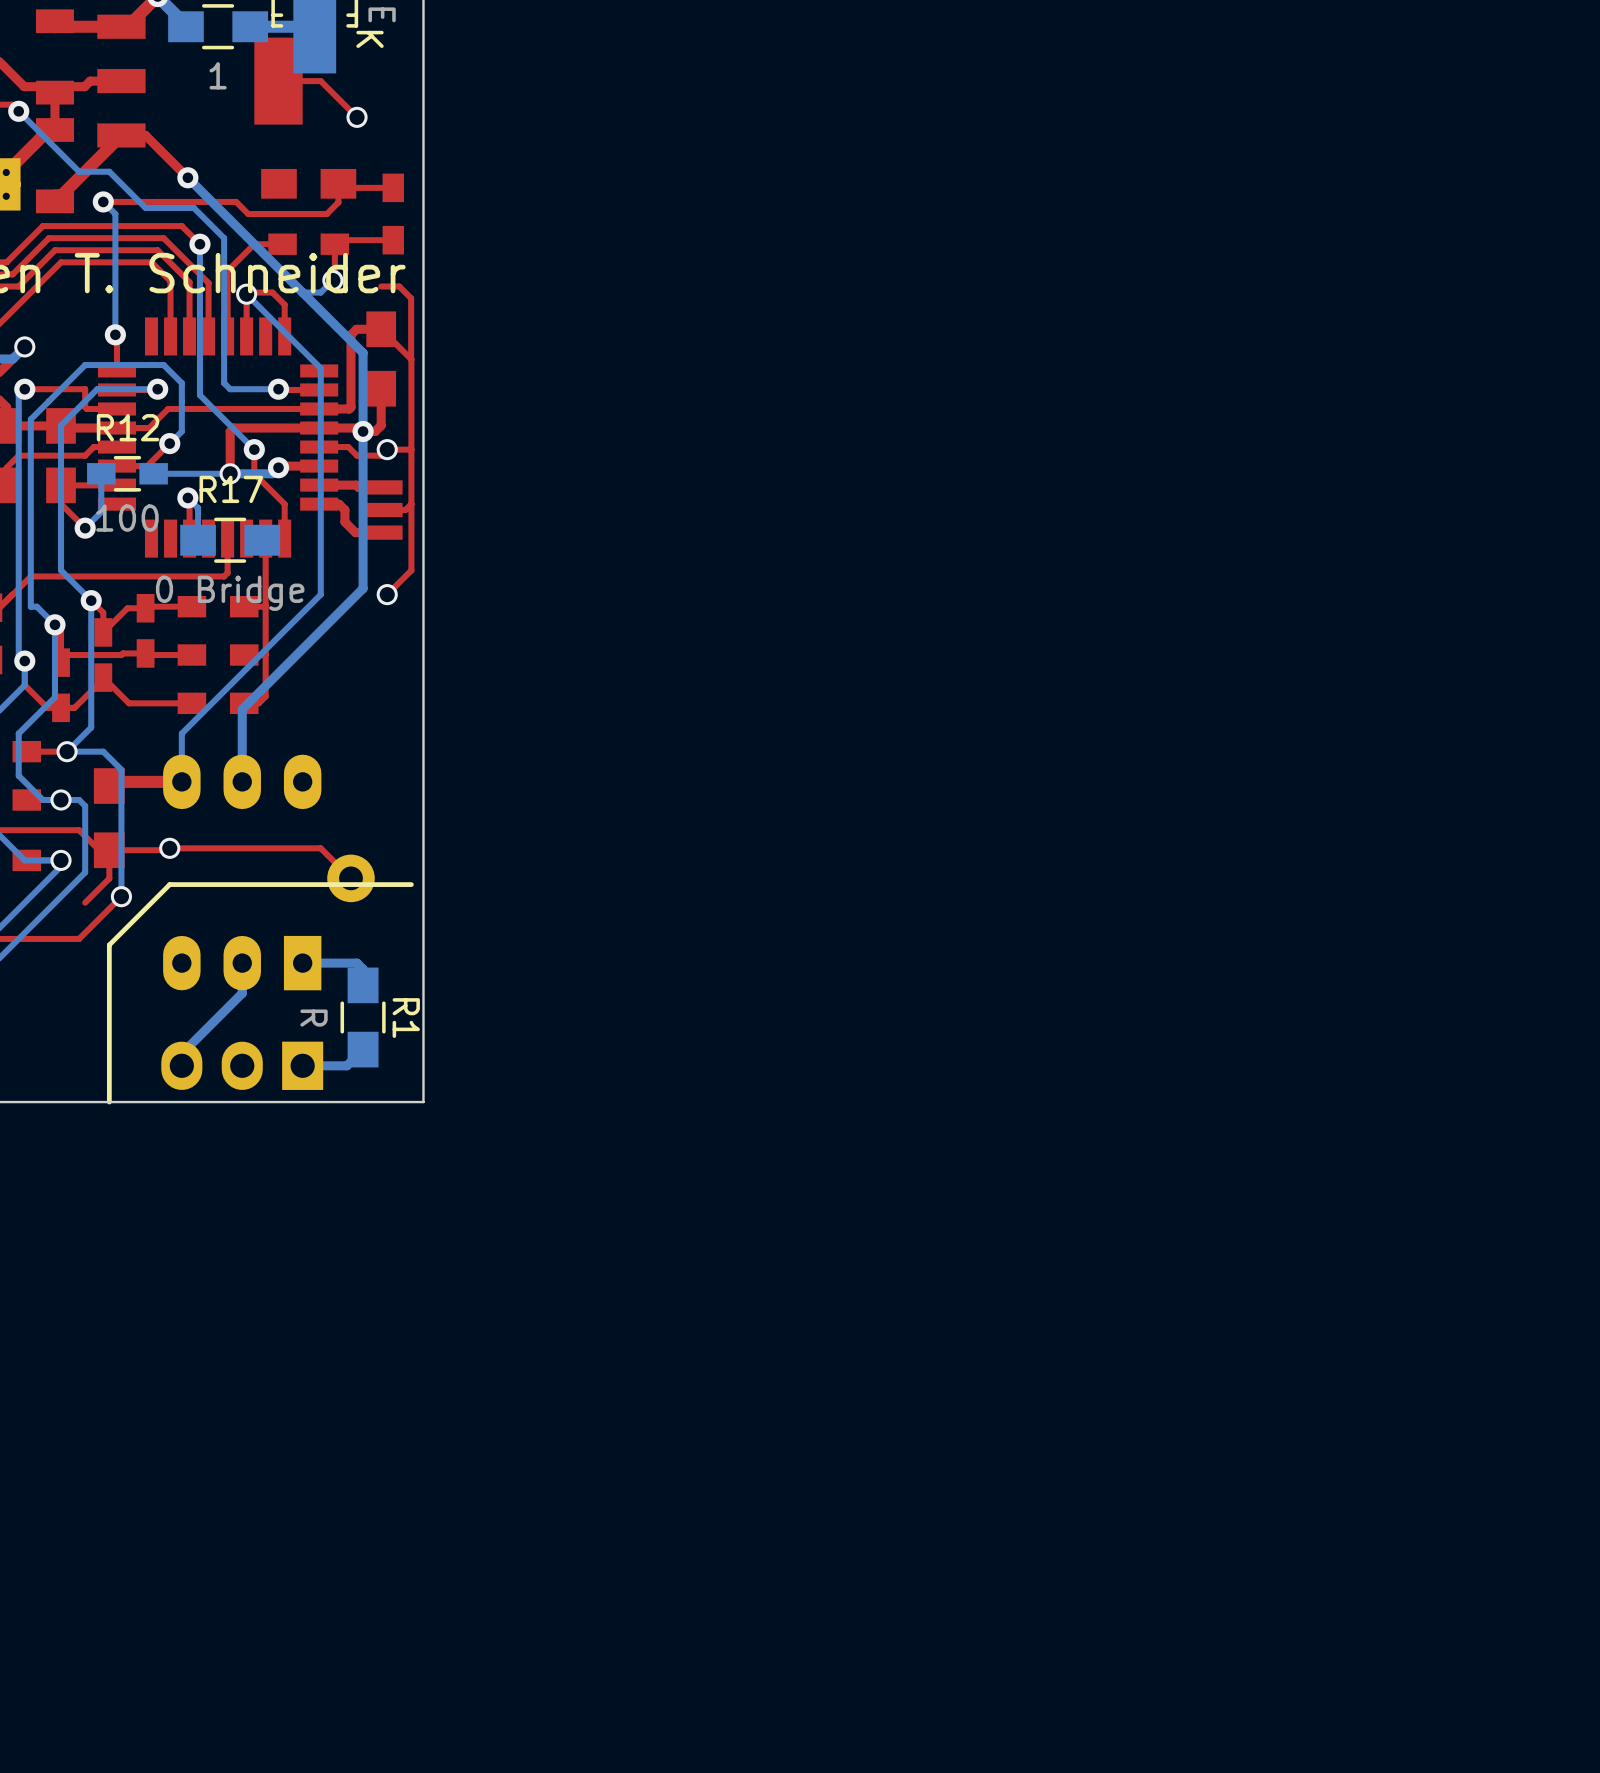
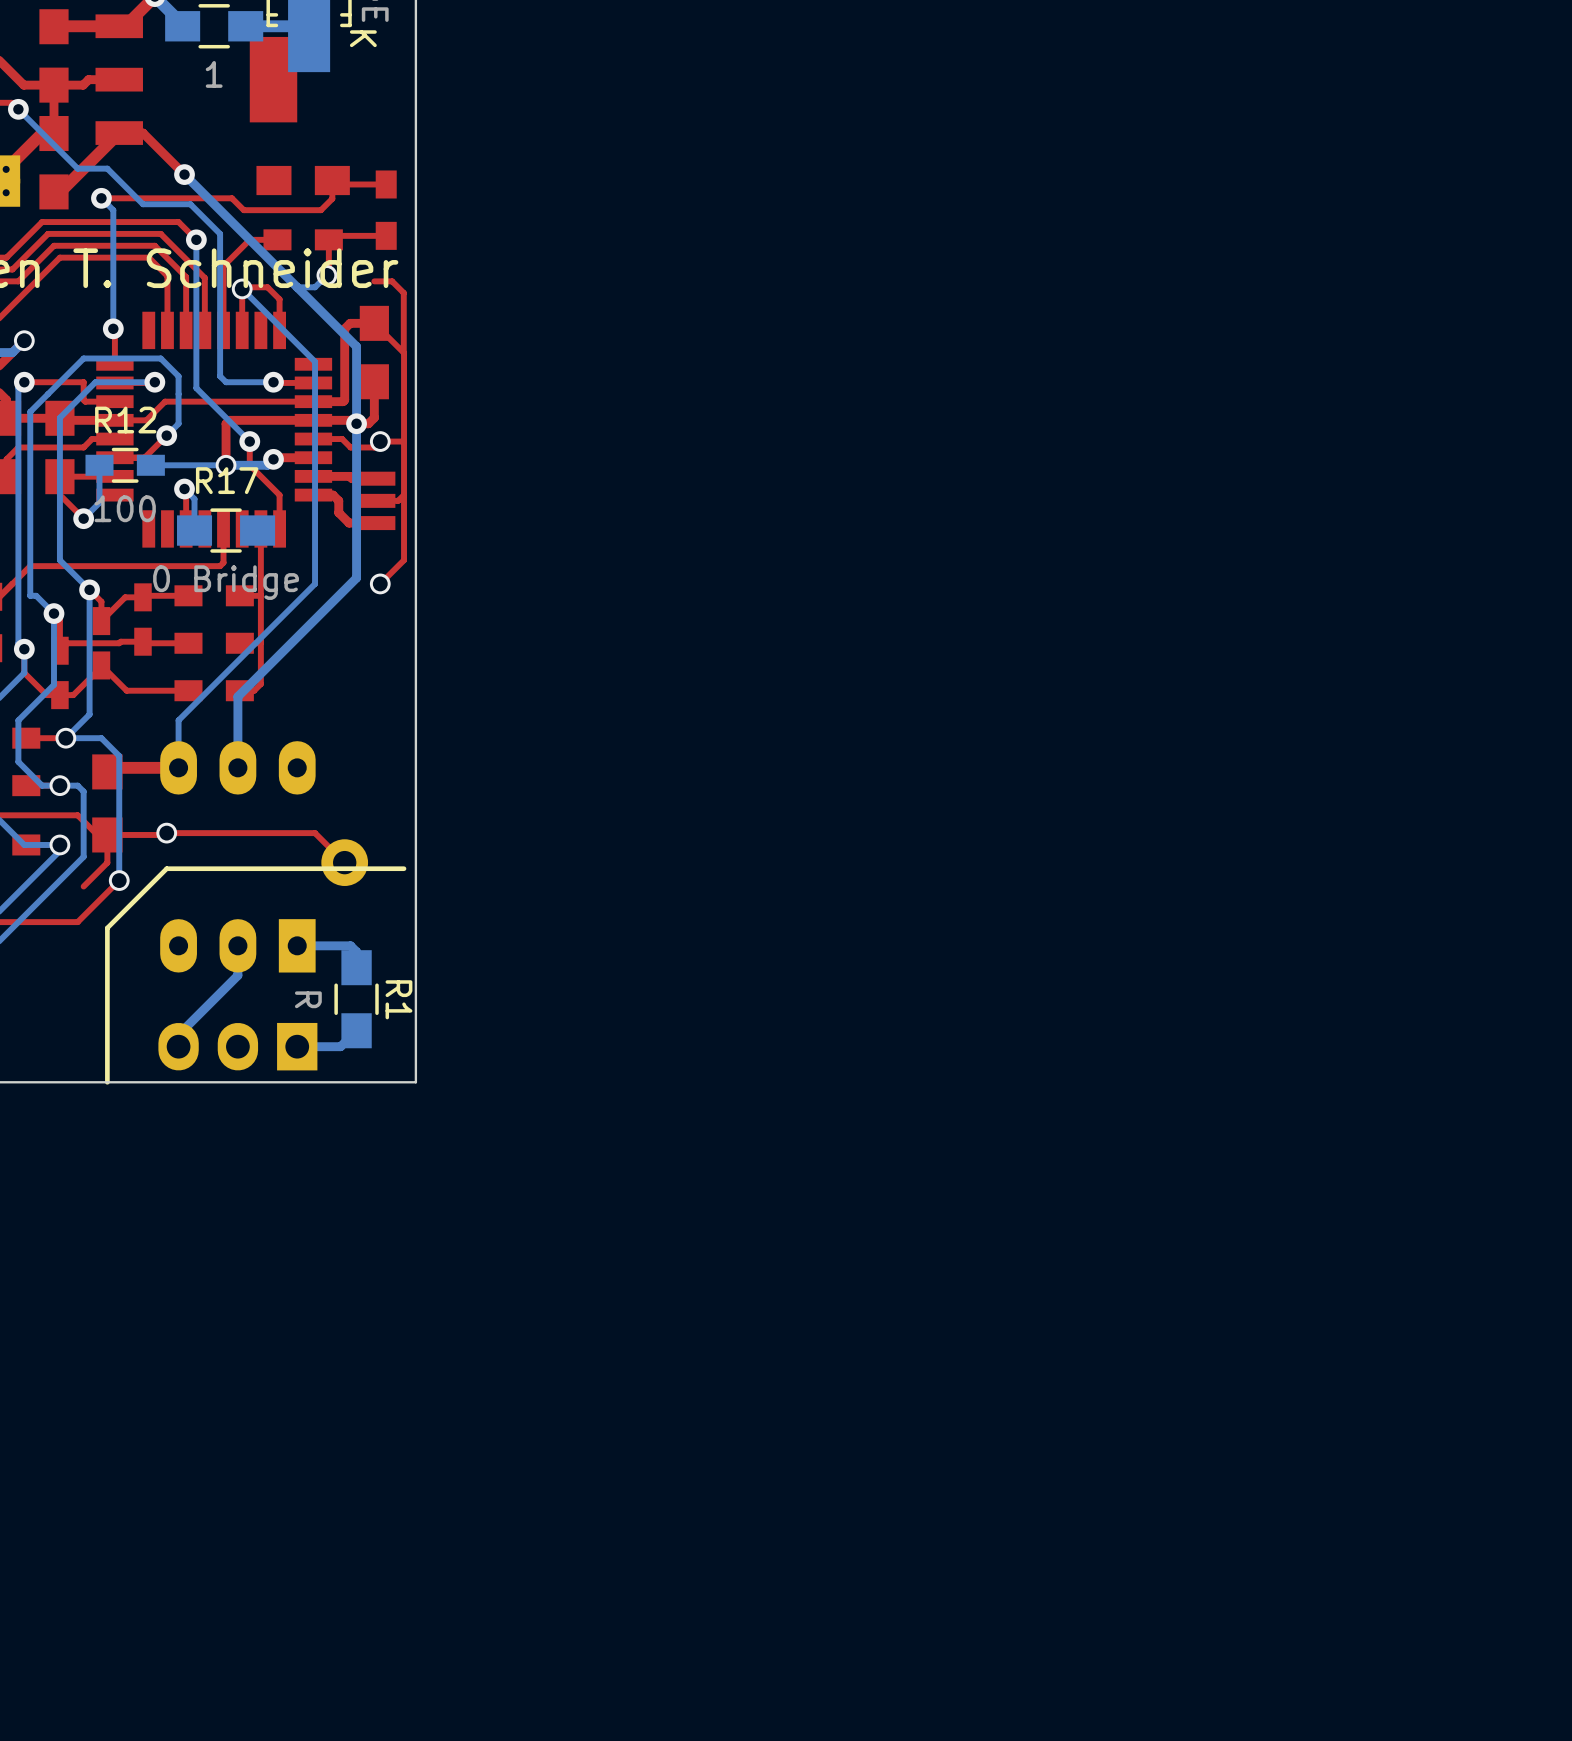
part footprint: [35, 9, 75, 105] -> [39, 9, 69, 103]
top track: (278, 81) (320, 81) (357, 117) -> none
via: (357, 117) -> none
part footprint: [35, 118, 75, 214] -> [39, 116, 69, 210]

